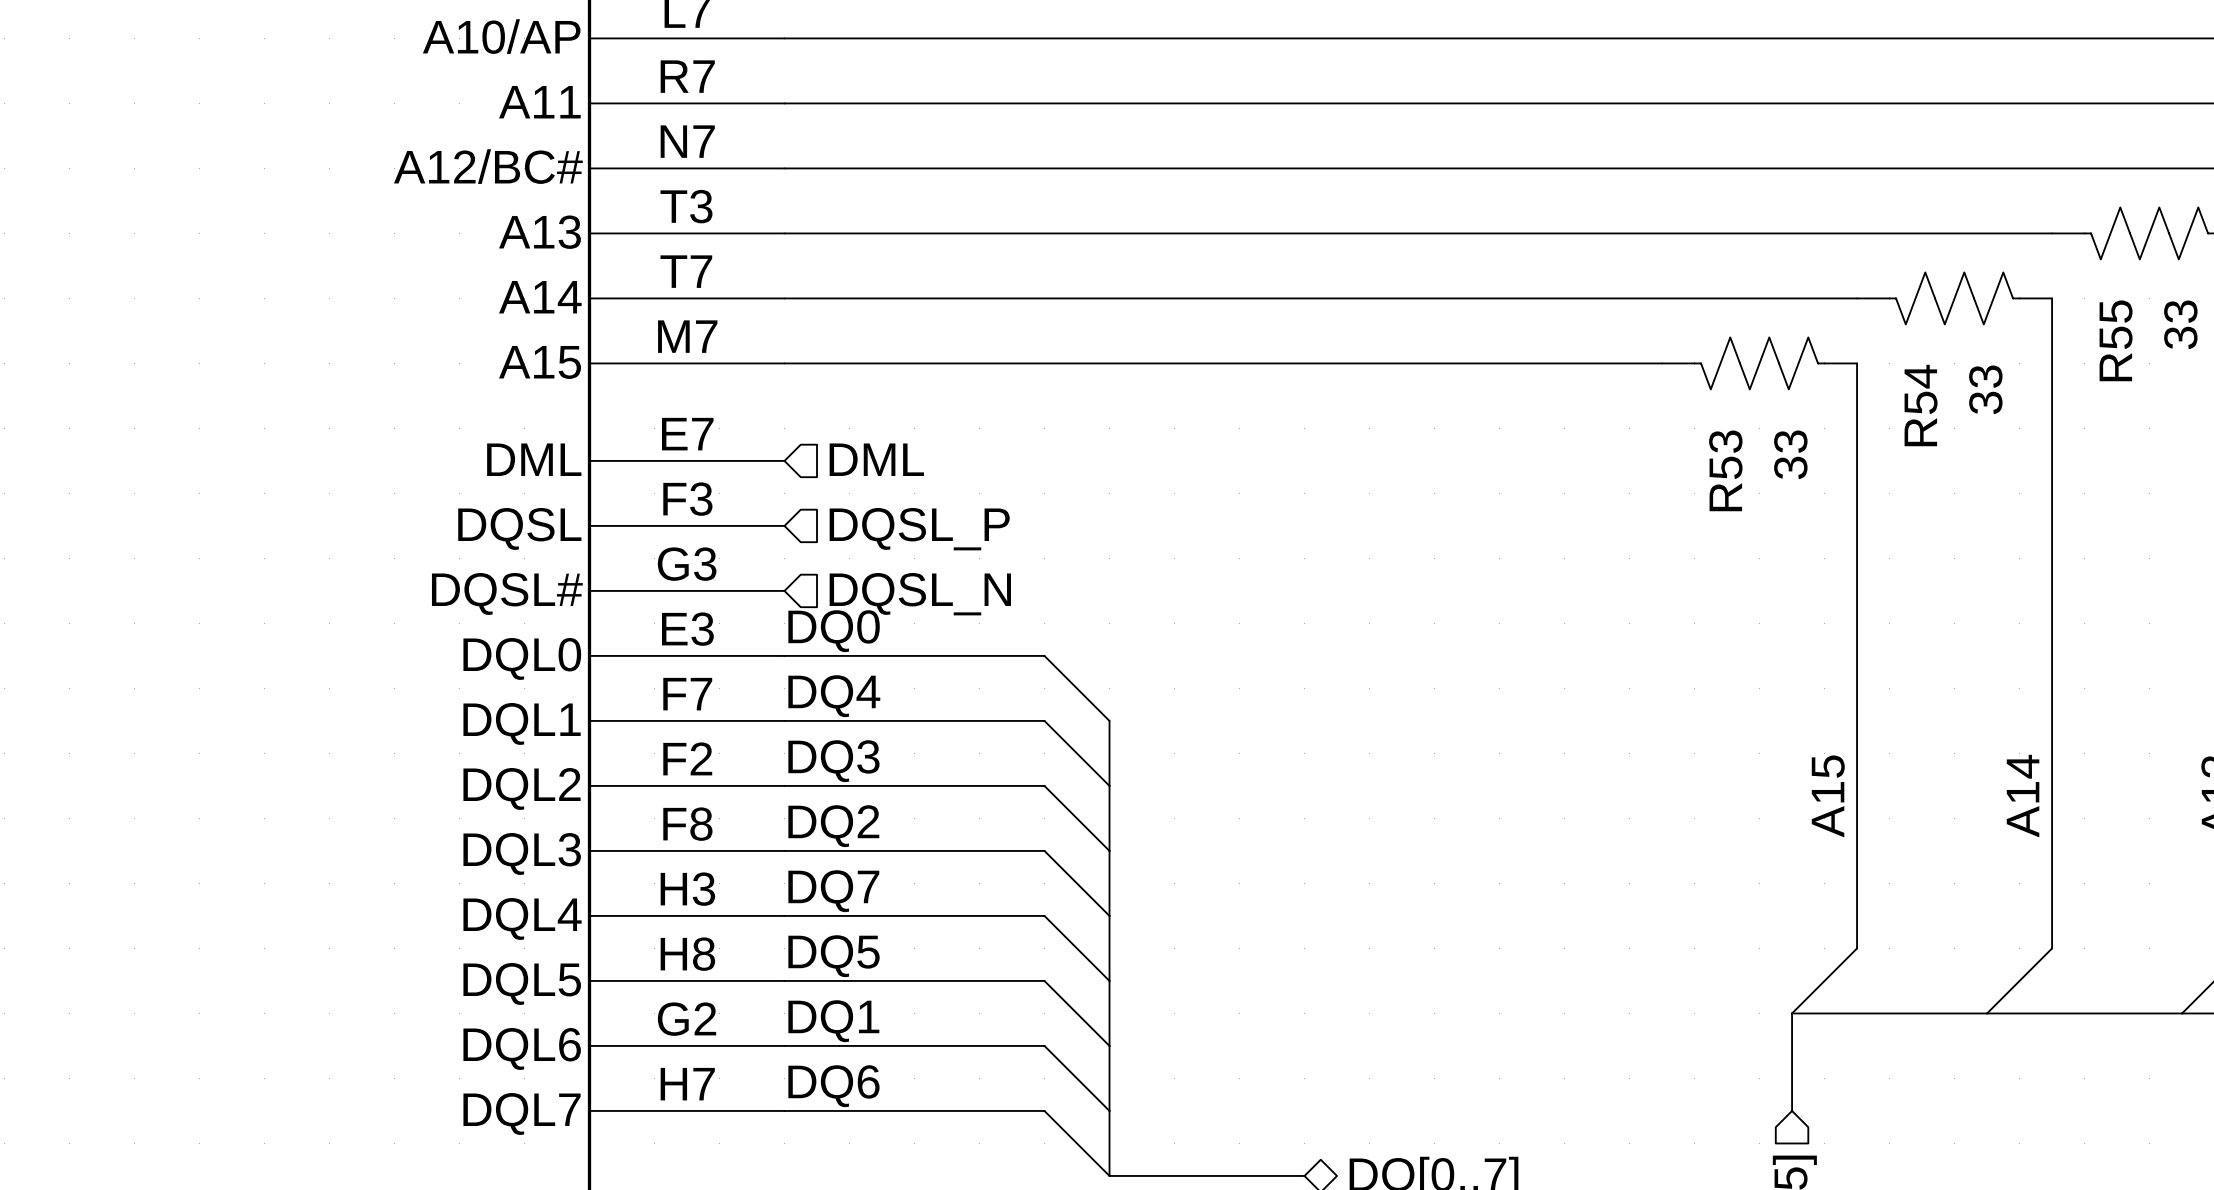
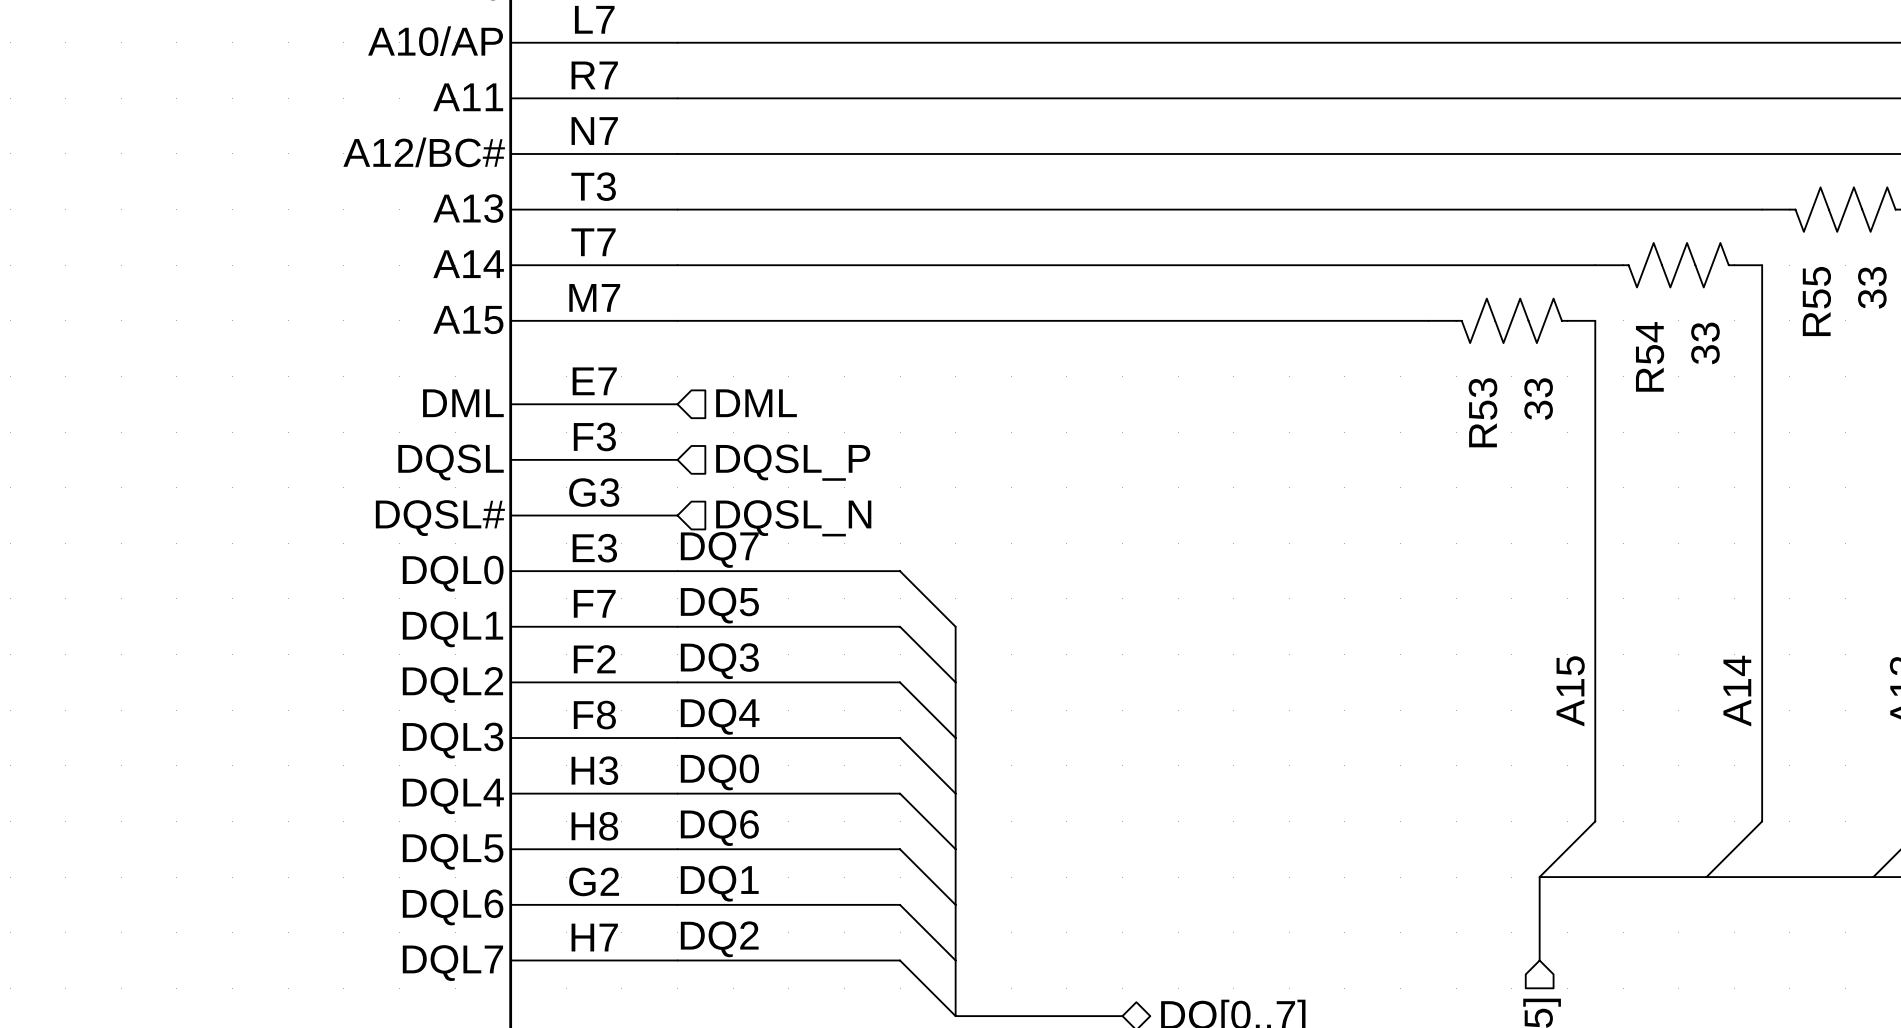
label: DQ0 (834, 631) -> DQ7 (719, 549)
label: DQ4 (834, 696) -> DQ5 (719, 605)
label: DQ2 (833, 826) -> DQ4 (720, 716)
label: DQ7 (833, 891) -> DQ0 (719, 772)
label: DQ5 (834, 956) -> DQ6 (719, 828)
label: DQ6 (833, 1086) -> DQ2 (719, 939)

